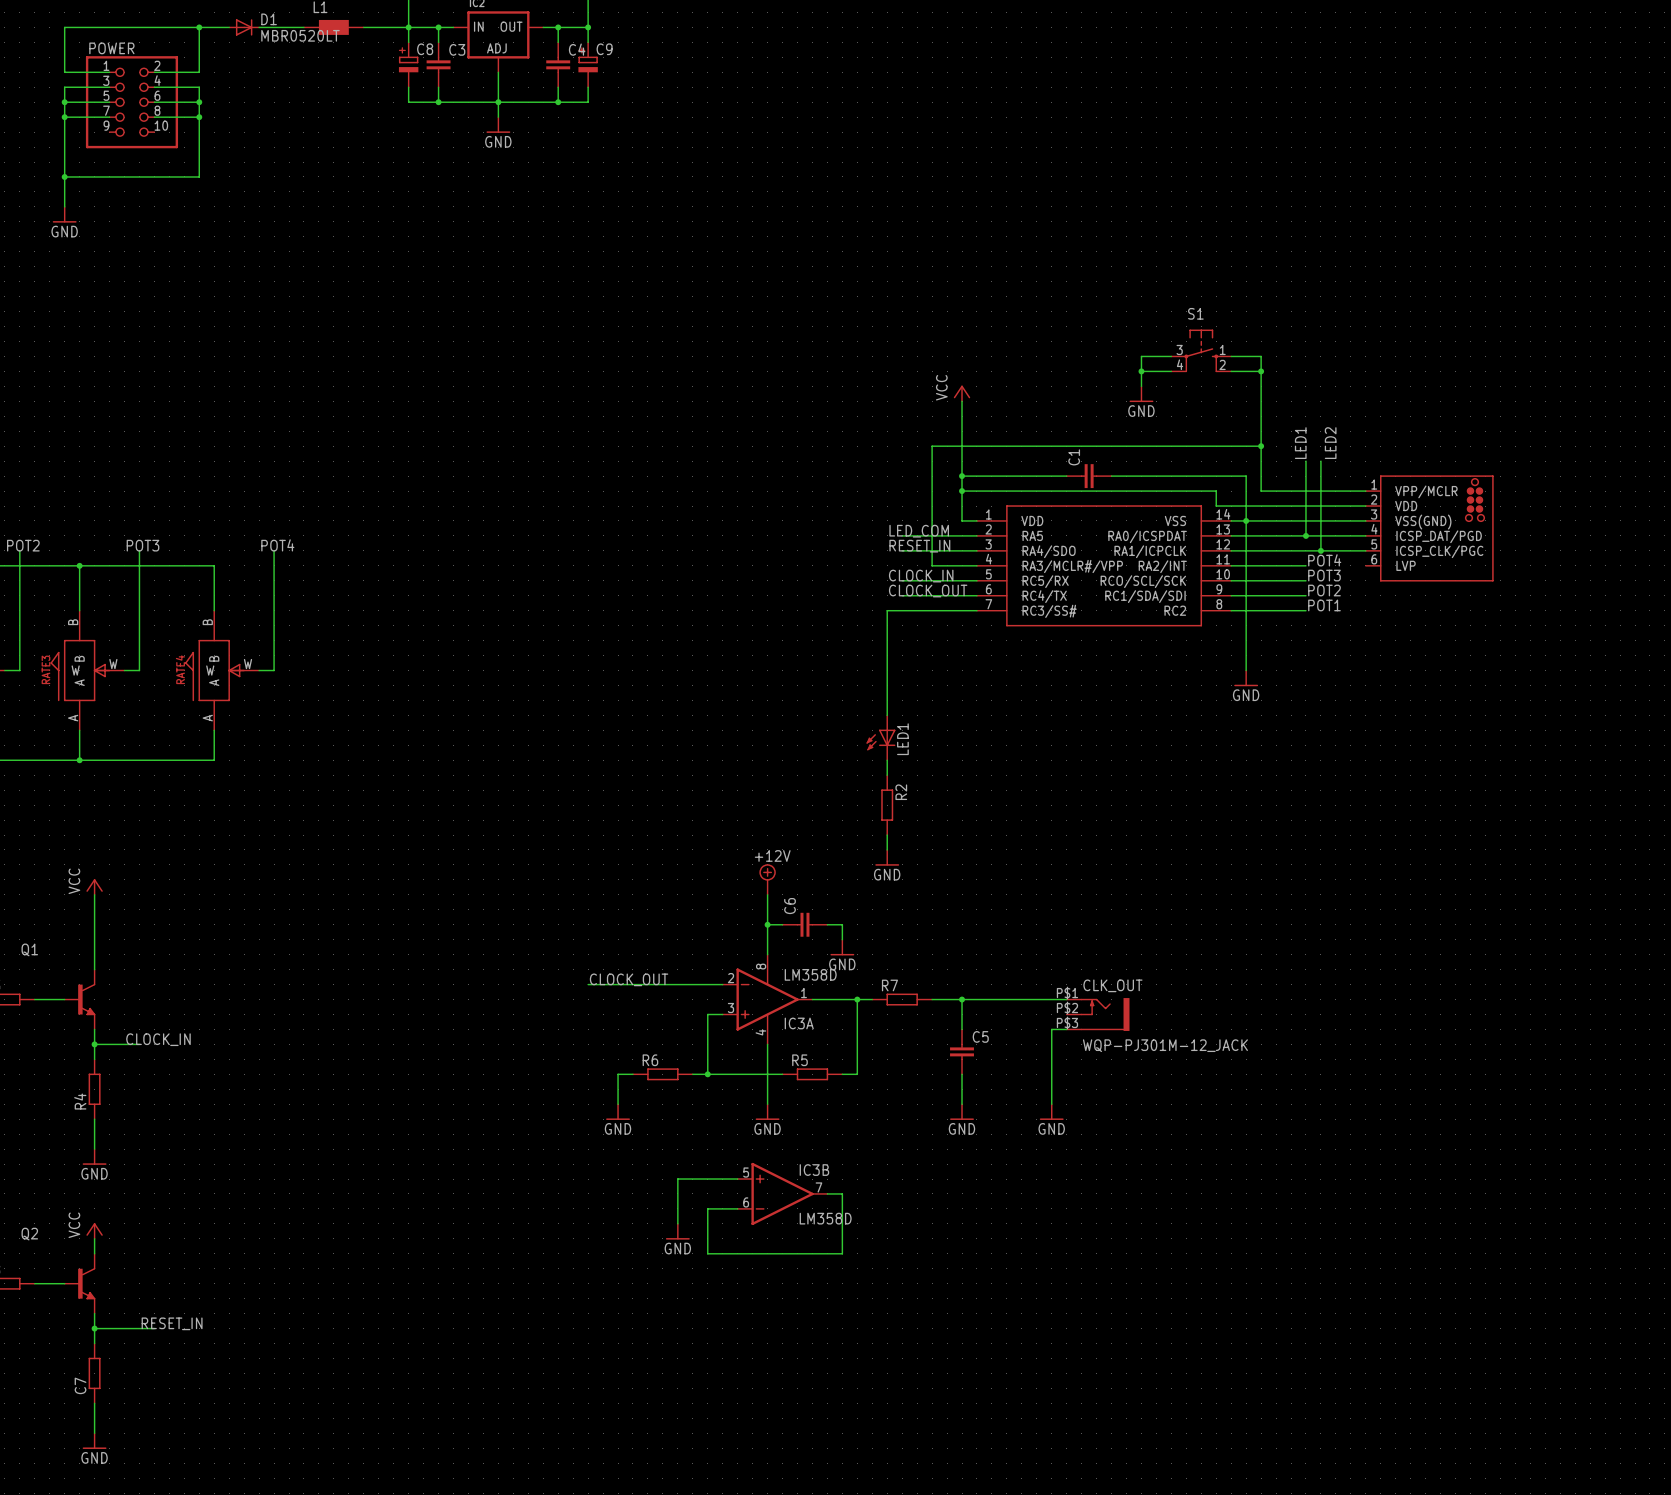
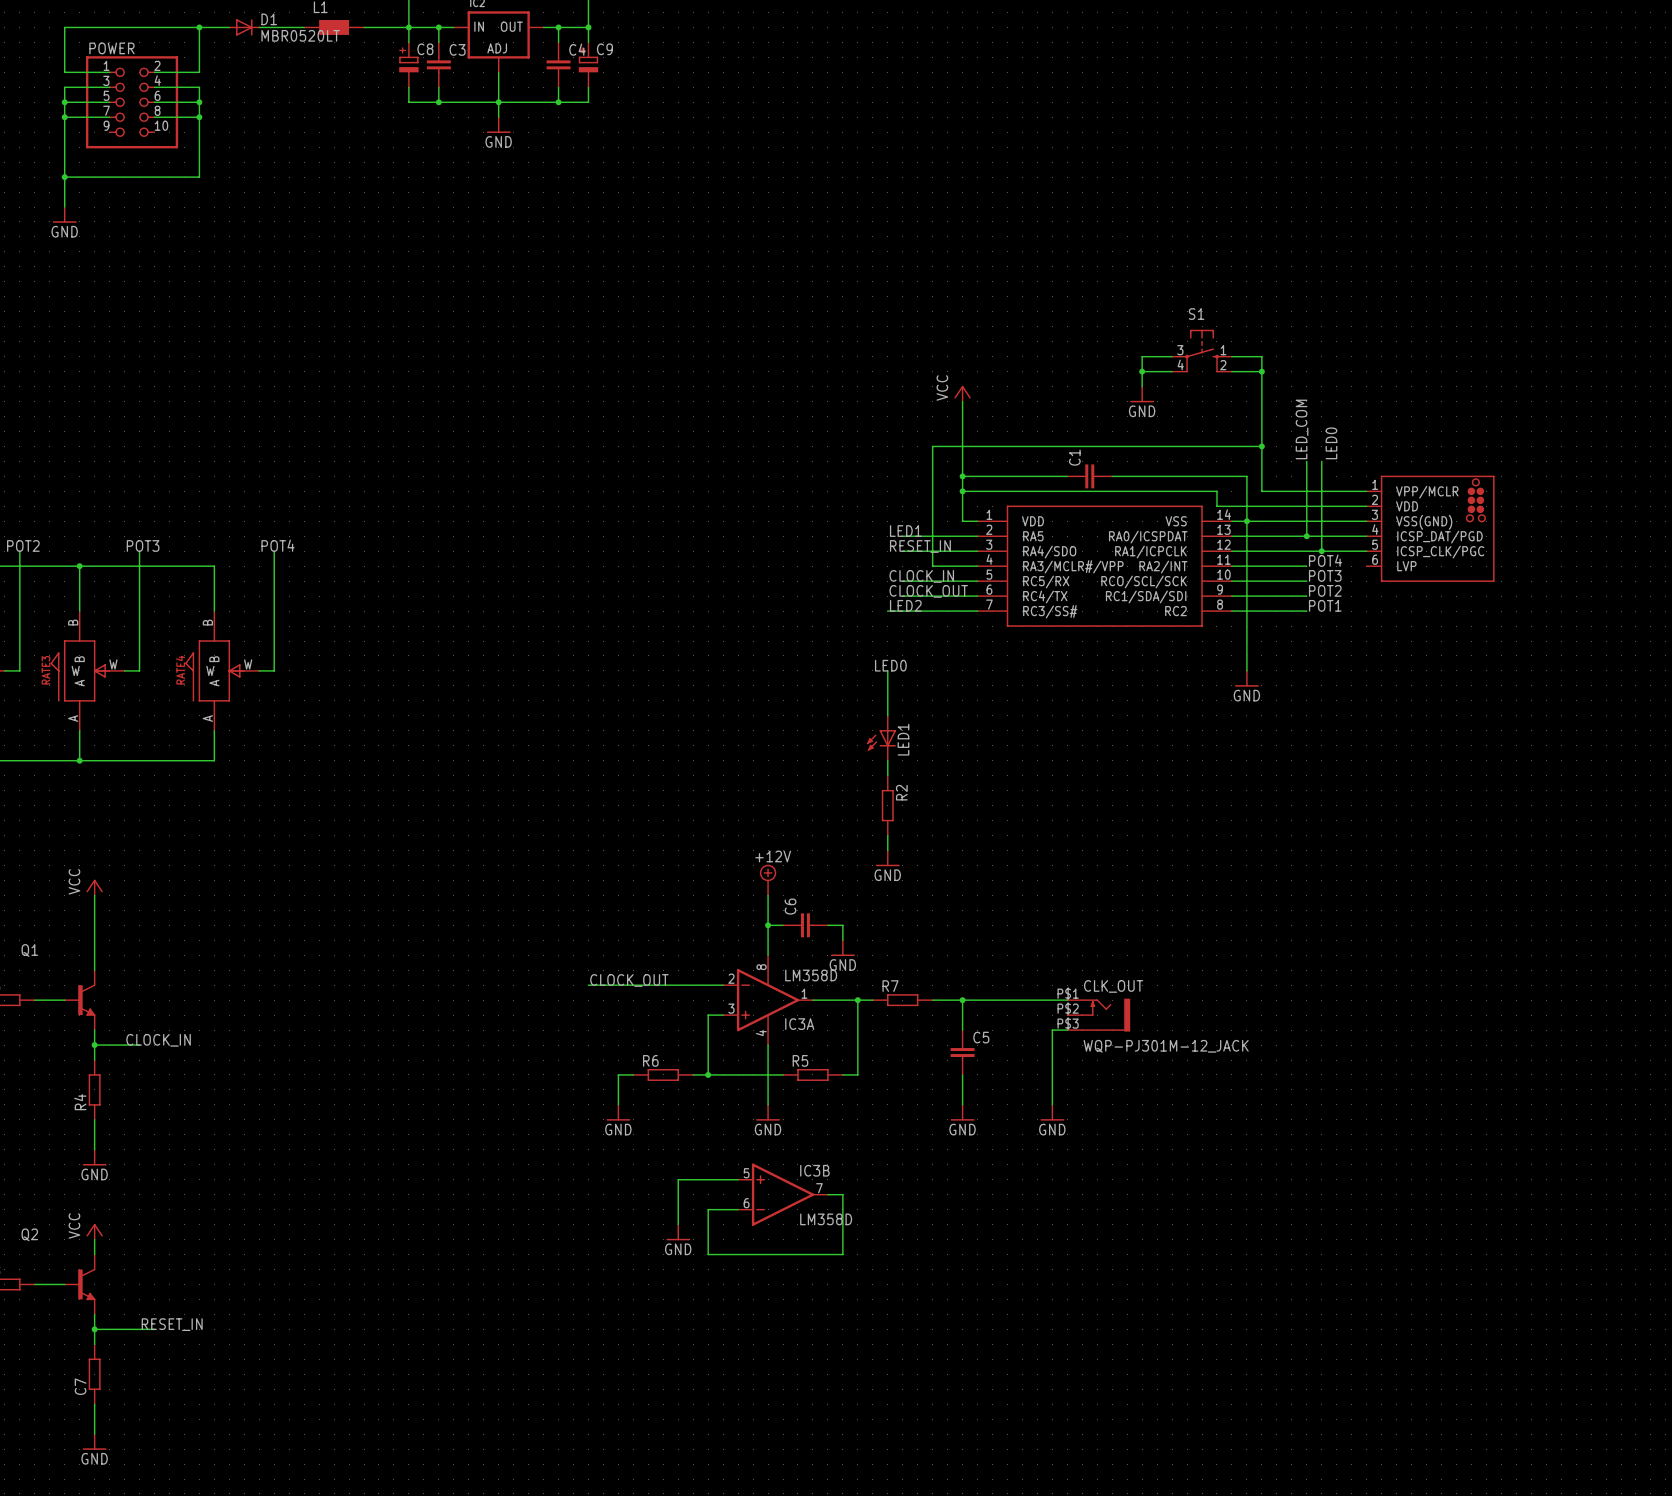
label: LED1 (1300, 443) -> LED_COM (1302, 429)
label: LED2 (1330, 443) -> LED0 (1331, 443)
label: LED_COM (919, 531) -> LED1 (905, 531)
label: none -> LED2 (905, 605)
wire: (887, 610) (887, 670) -> none
label: none -> LED0 (890, 665)

